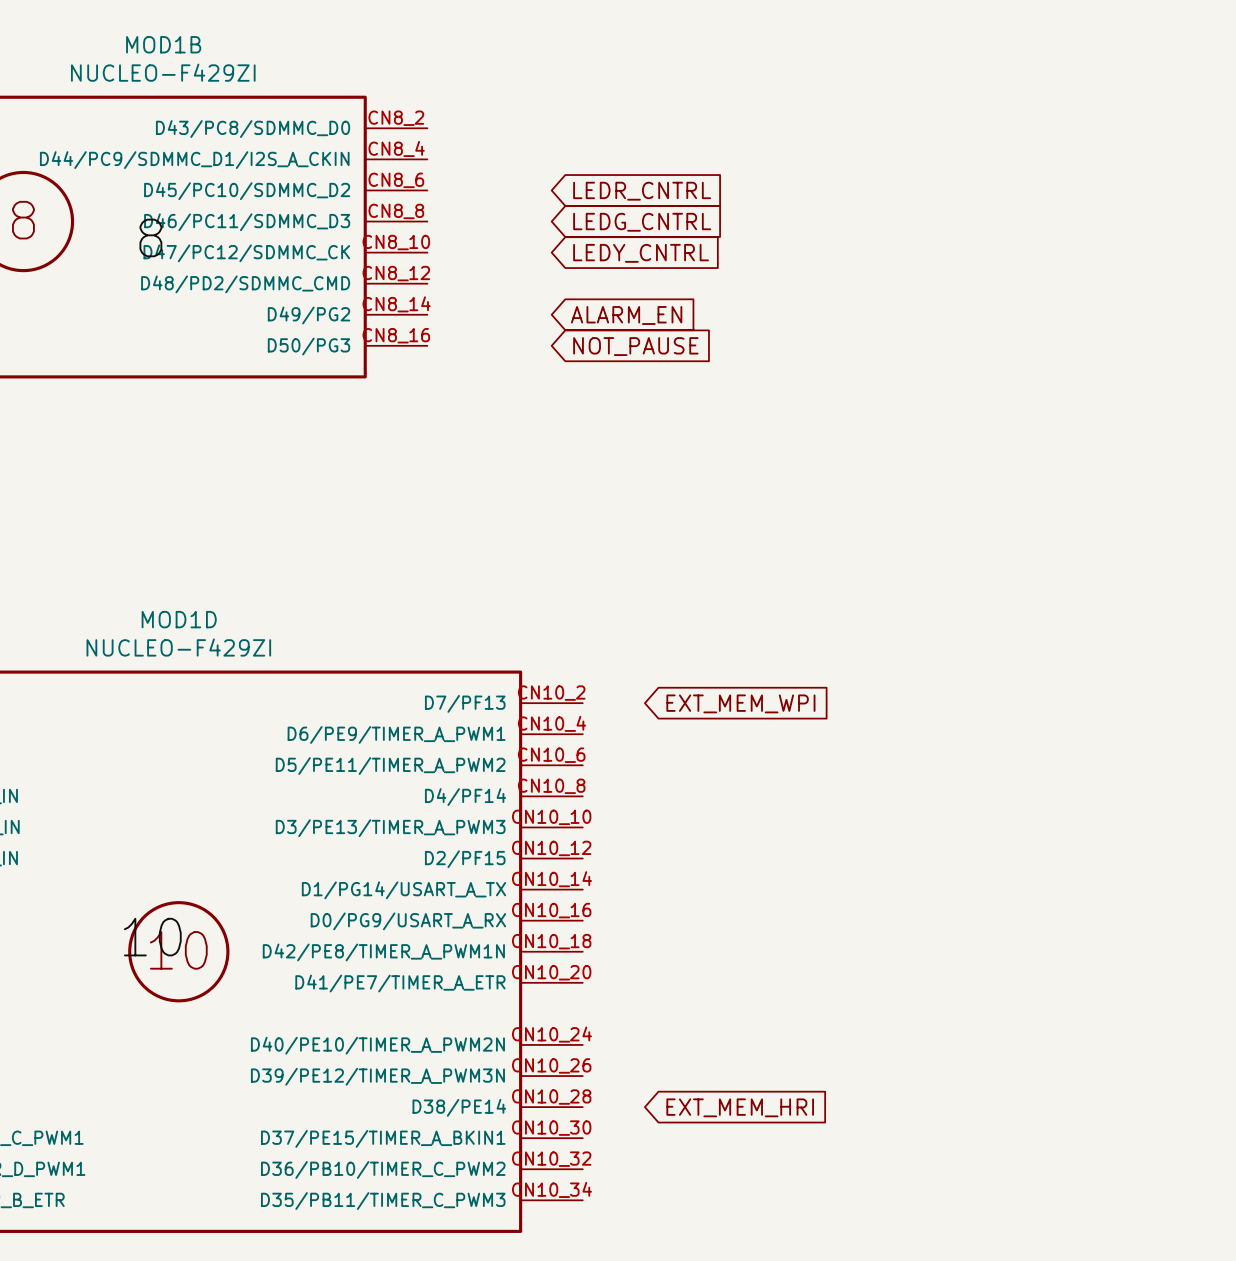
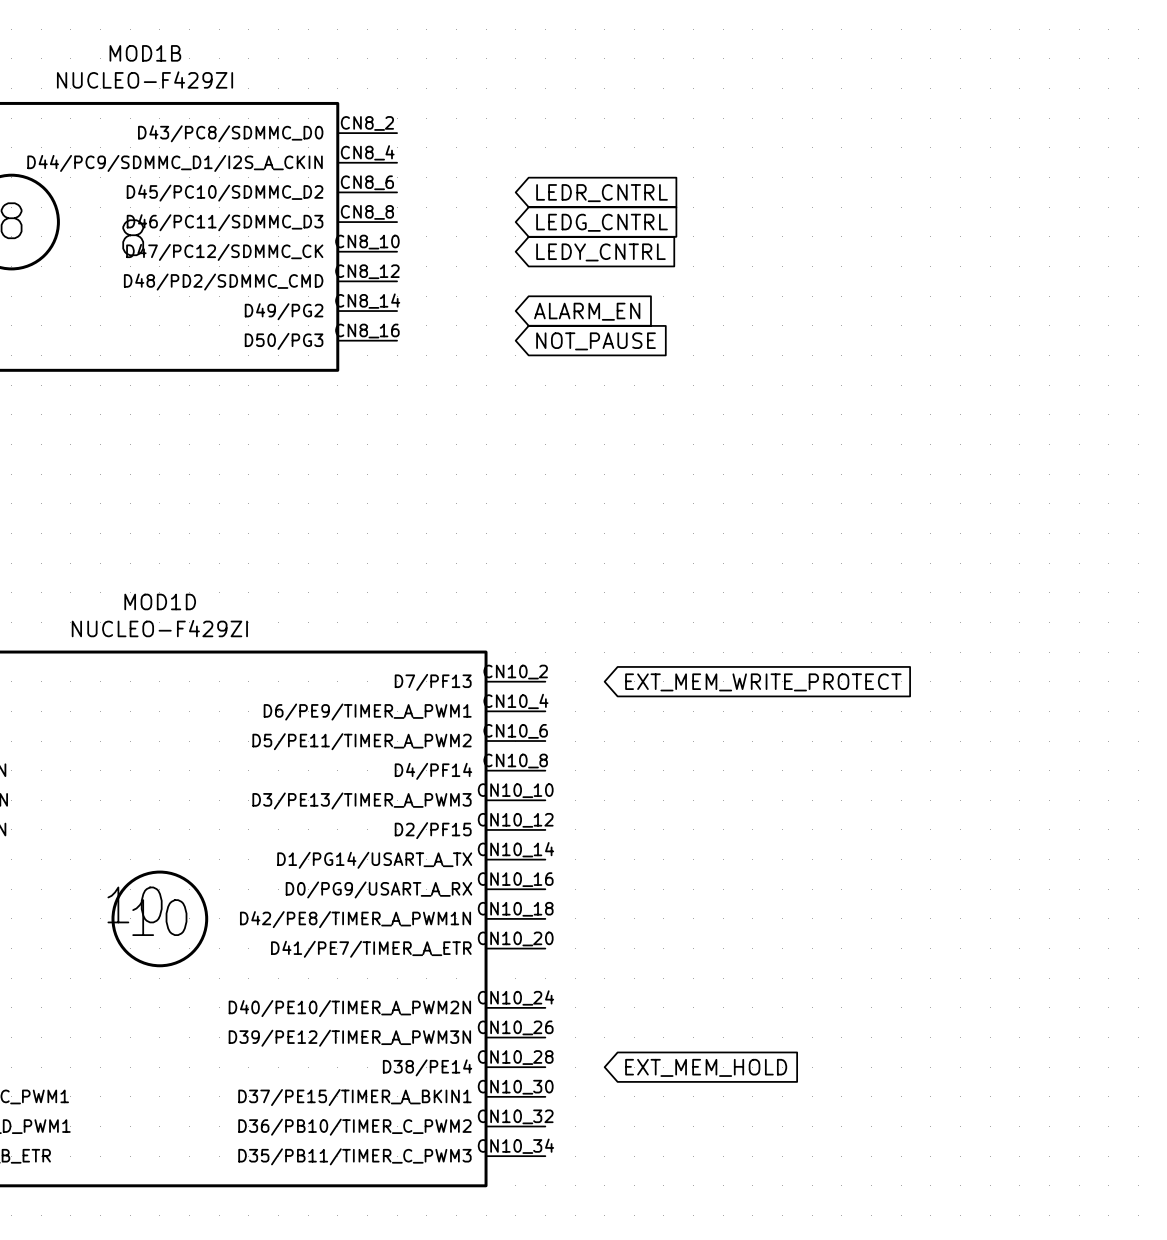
global label: EXT_MEM_WPI (740, 703) -> EXT_MEM_WRITE_PROTECT (763, 682)
global label: EXT_MEM_HRI (740, 1107) -> EXT_MEM_HOLD (706, 1067)

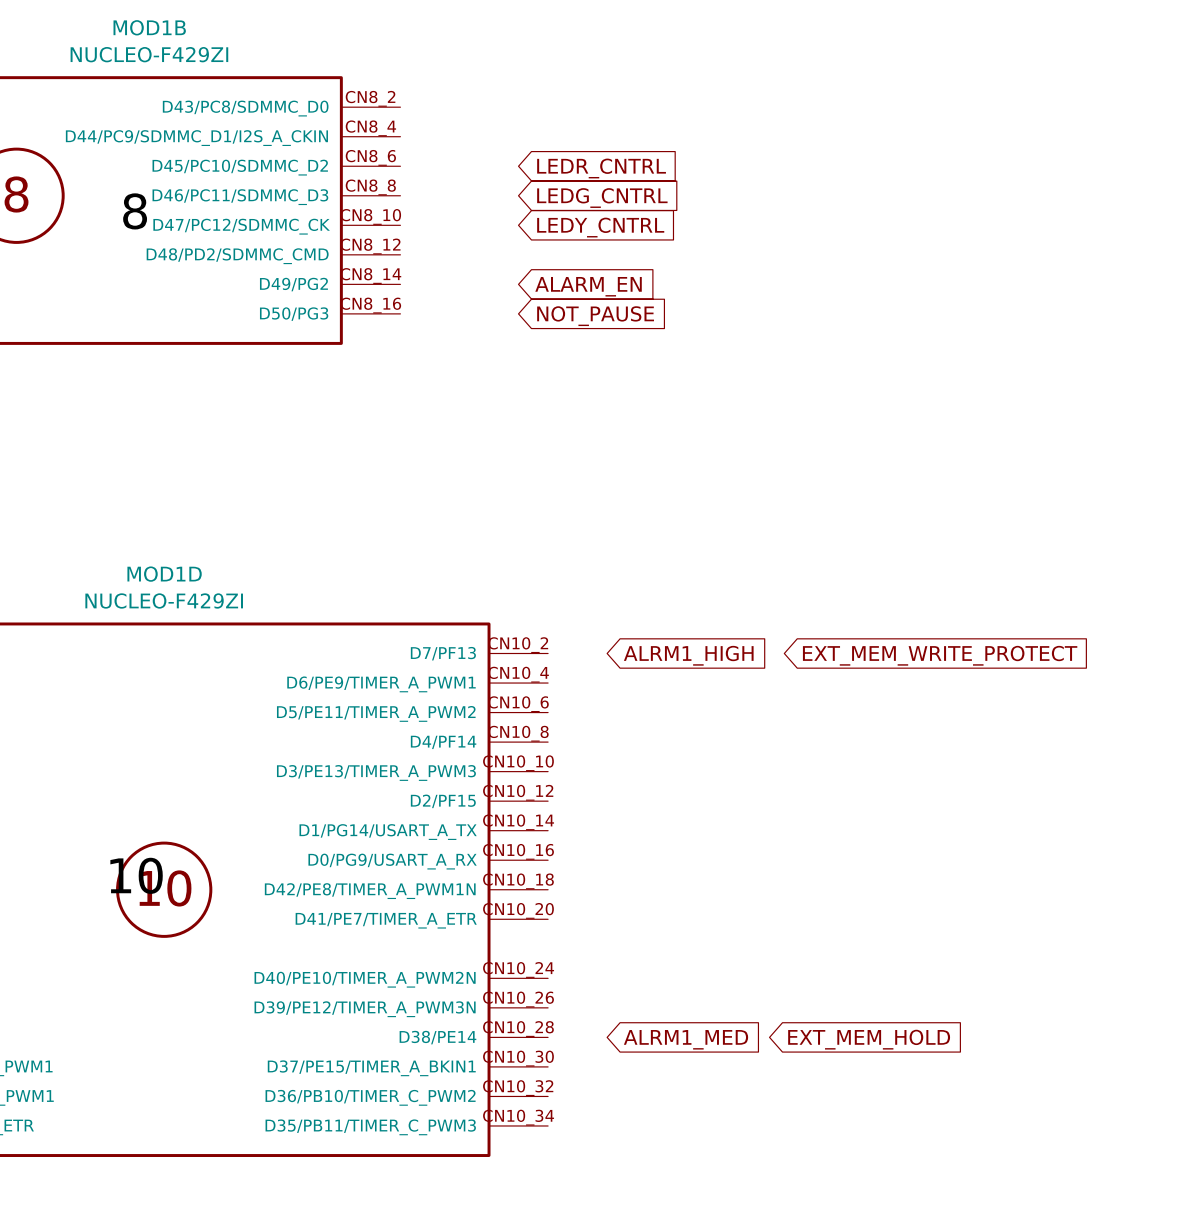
global label: EXT_MEM_WRITE_PROTECT (763, 682) -> ALRM1_HIGH (688, 655)
global label: none -> EXT_MEM_WRITE_PROTECT (940, 655)
global label: EXT_MEM_HOLD (706, 1067) -> ALRM1_MED (686, 1039)
global label: none -> EXT_MEM_HOLD (869, 1039)

